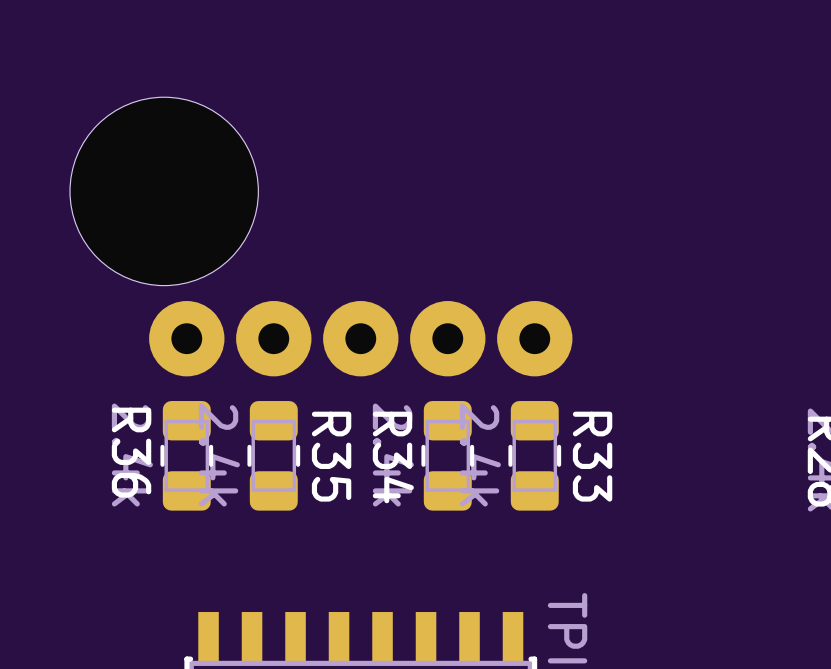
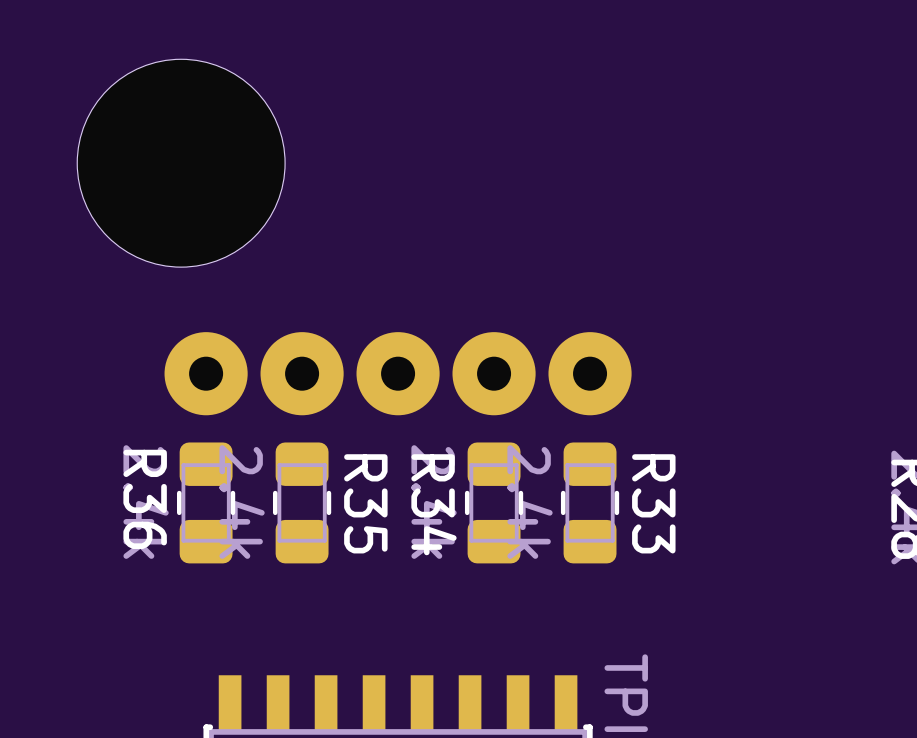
part position: (164, 191) -> (181, 163)

